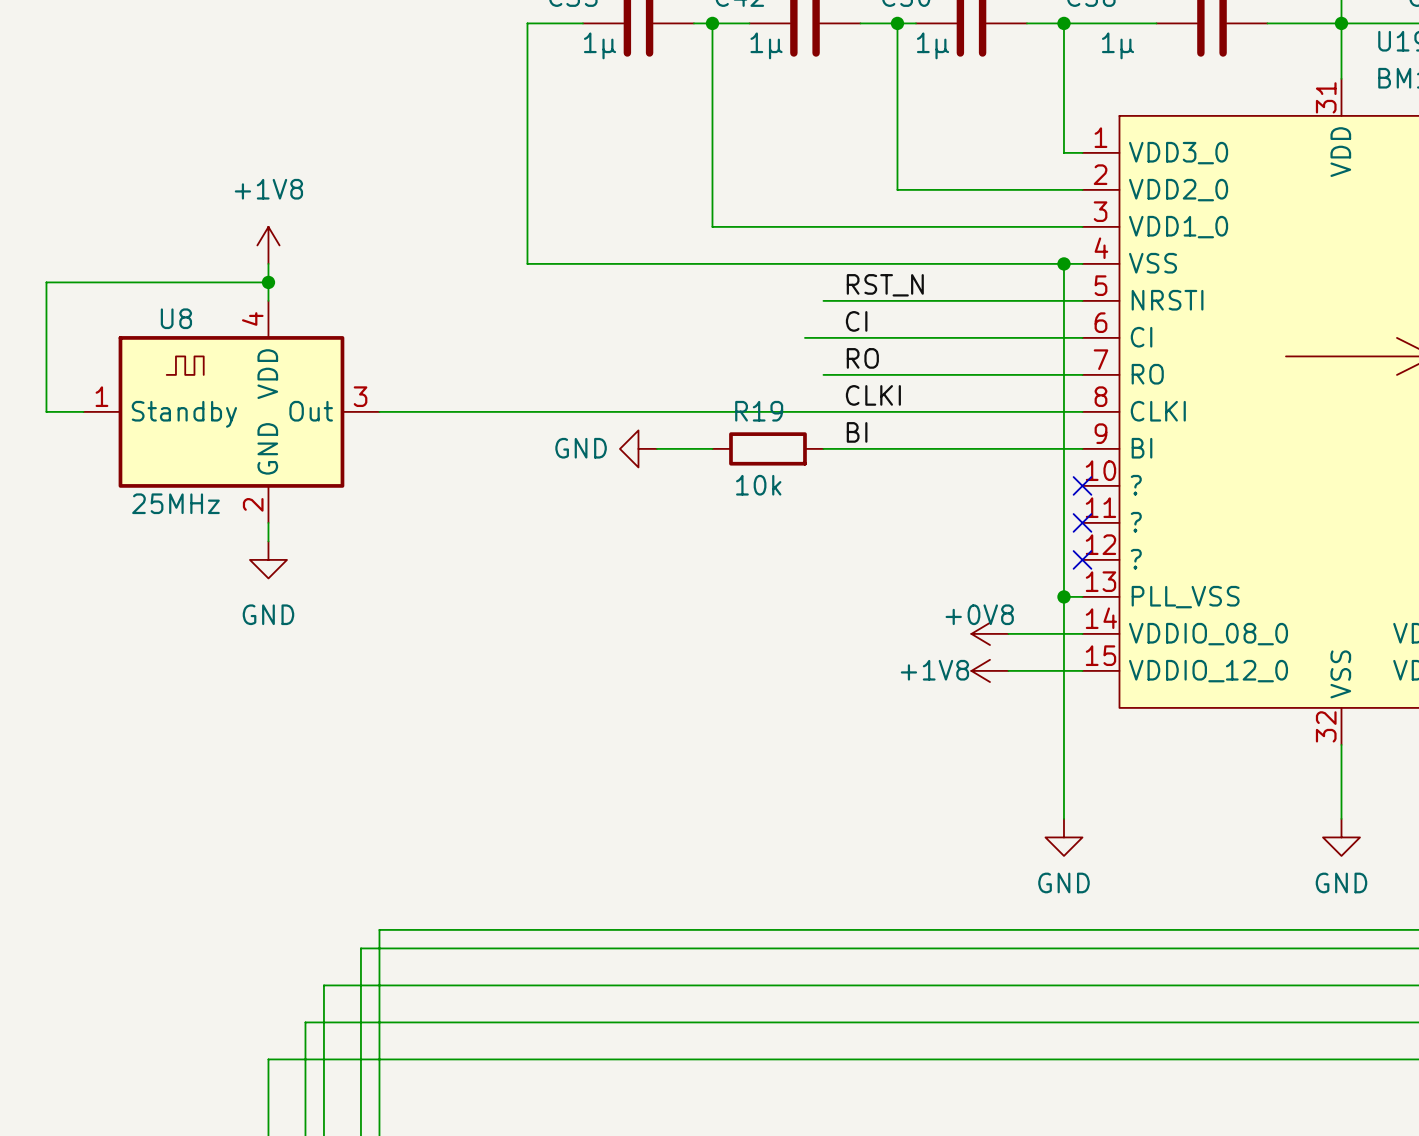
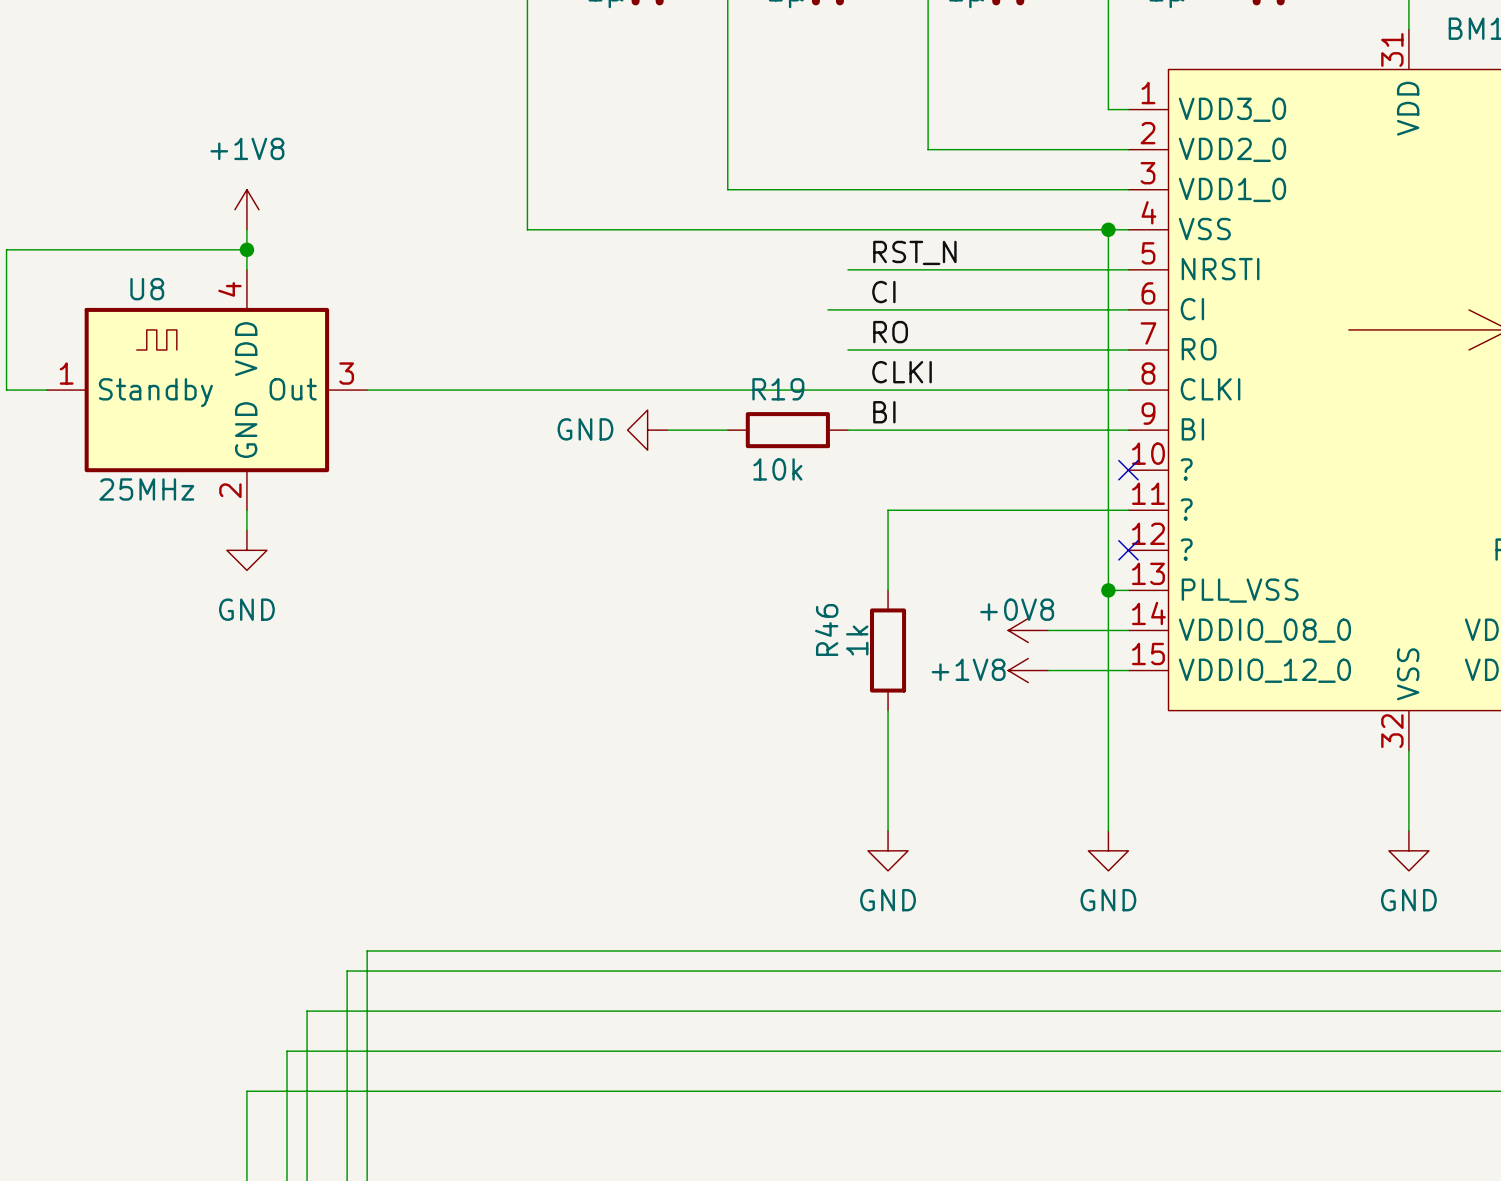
wire: none -> (1128, 510) (888, 510) (888, 590)
no-connect mark: (1082, 522) -> none
R46: none -> 1k (888, 650)
wire: none -> (888, 710) (888, 830)
power symbol: none -> GND (888, 850)

